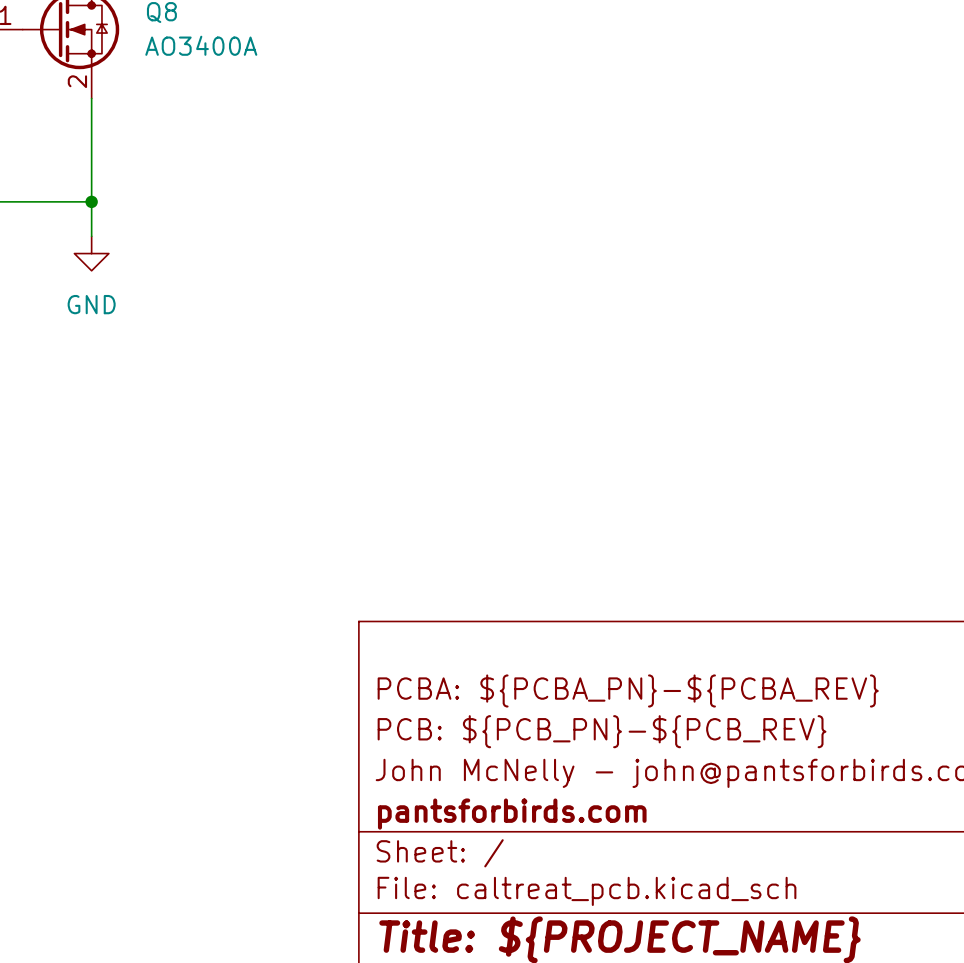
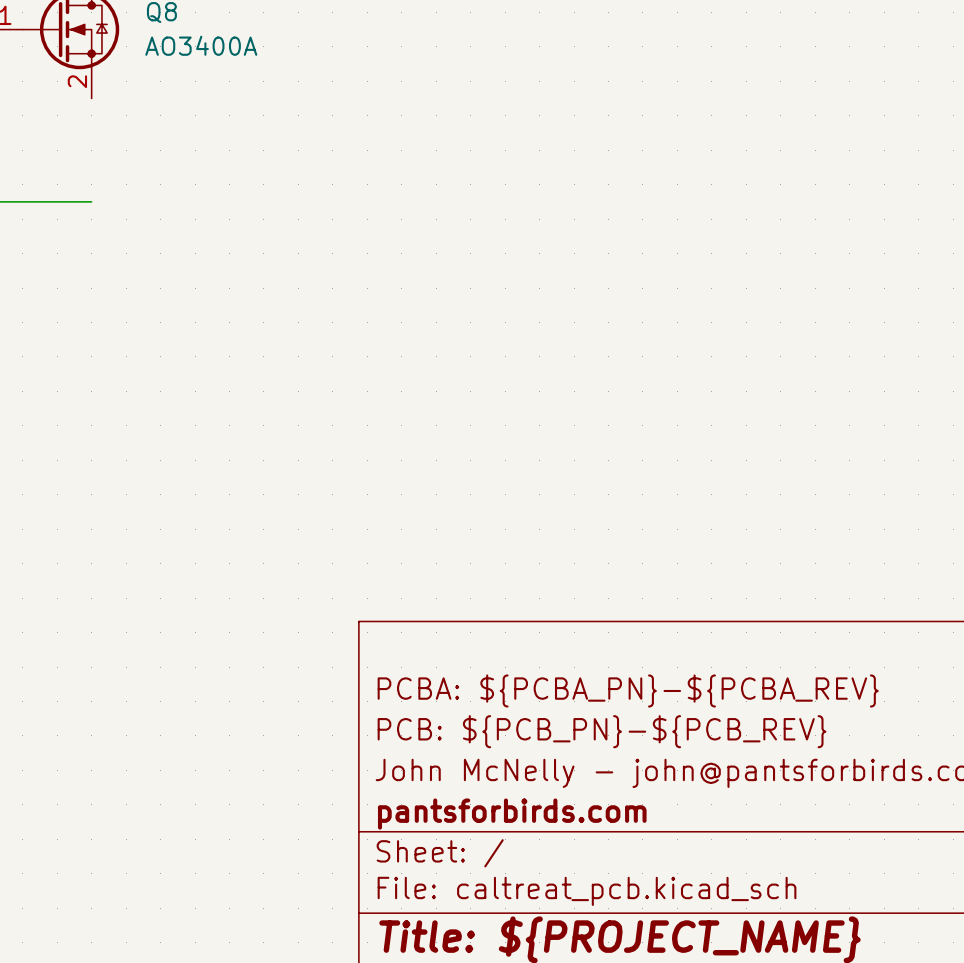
wire: (91, 98) (91, 236) -> none
junction: (91, 201) -> none
power symbol: GND (91, 253) -> none

